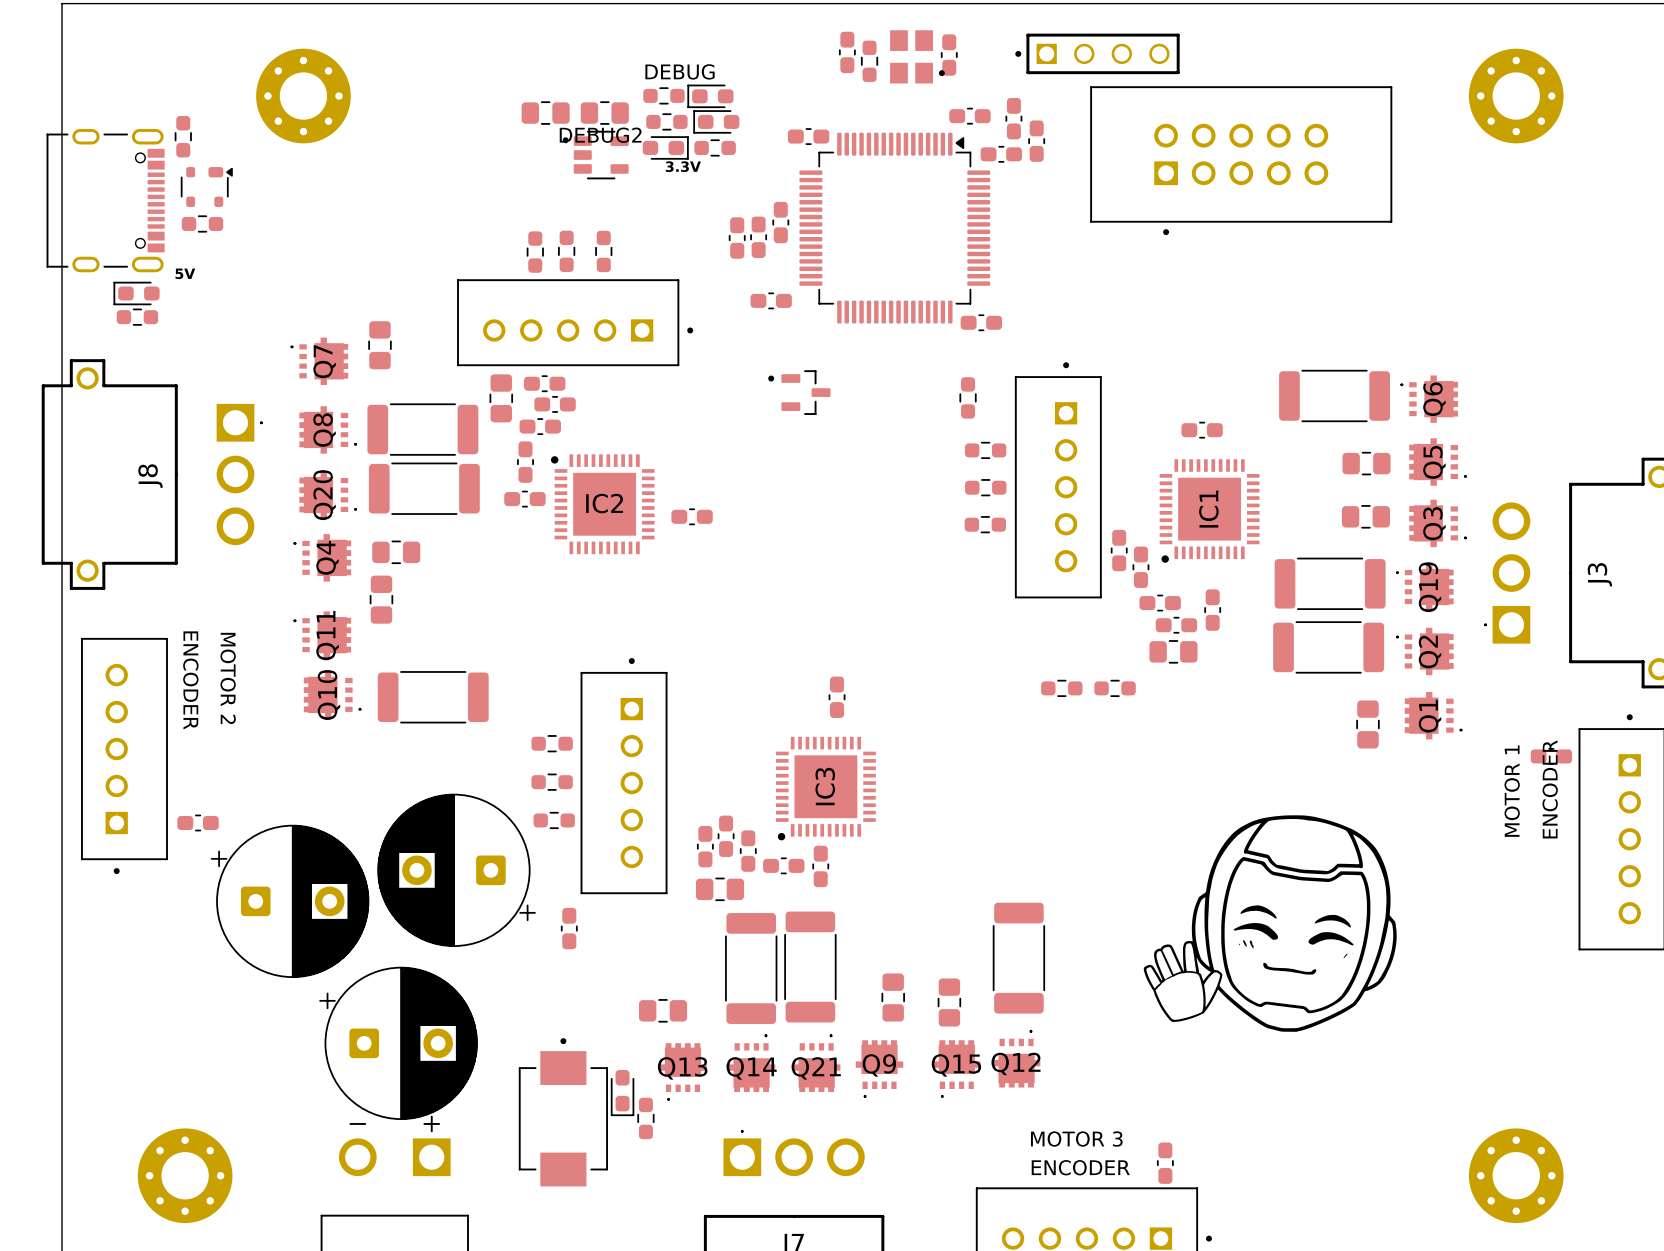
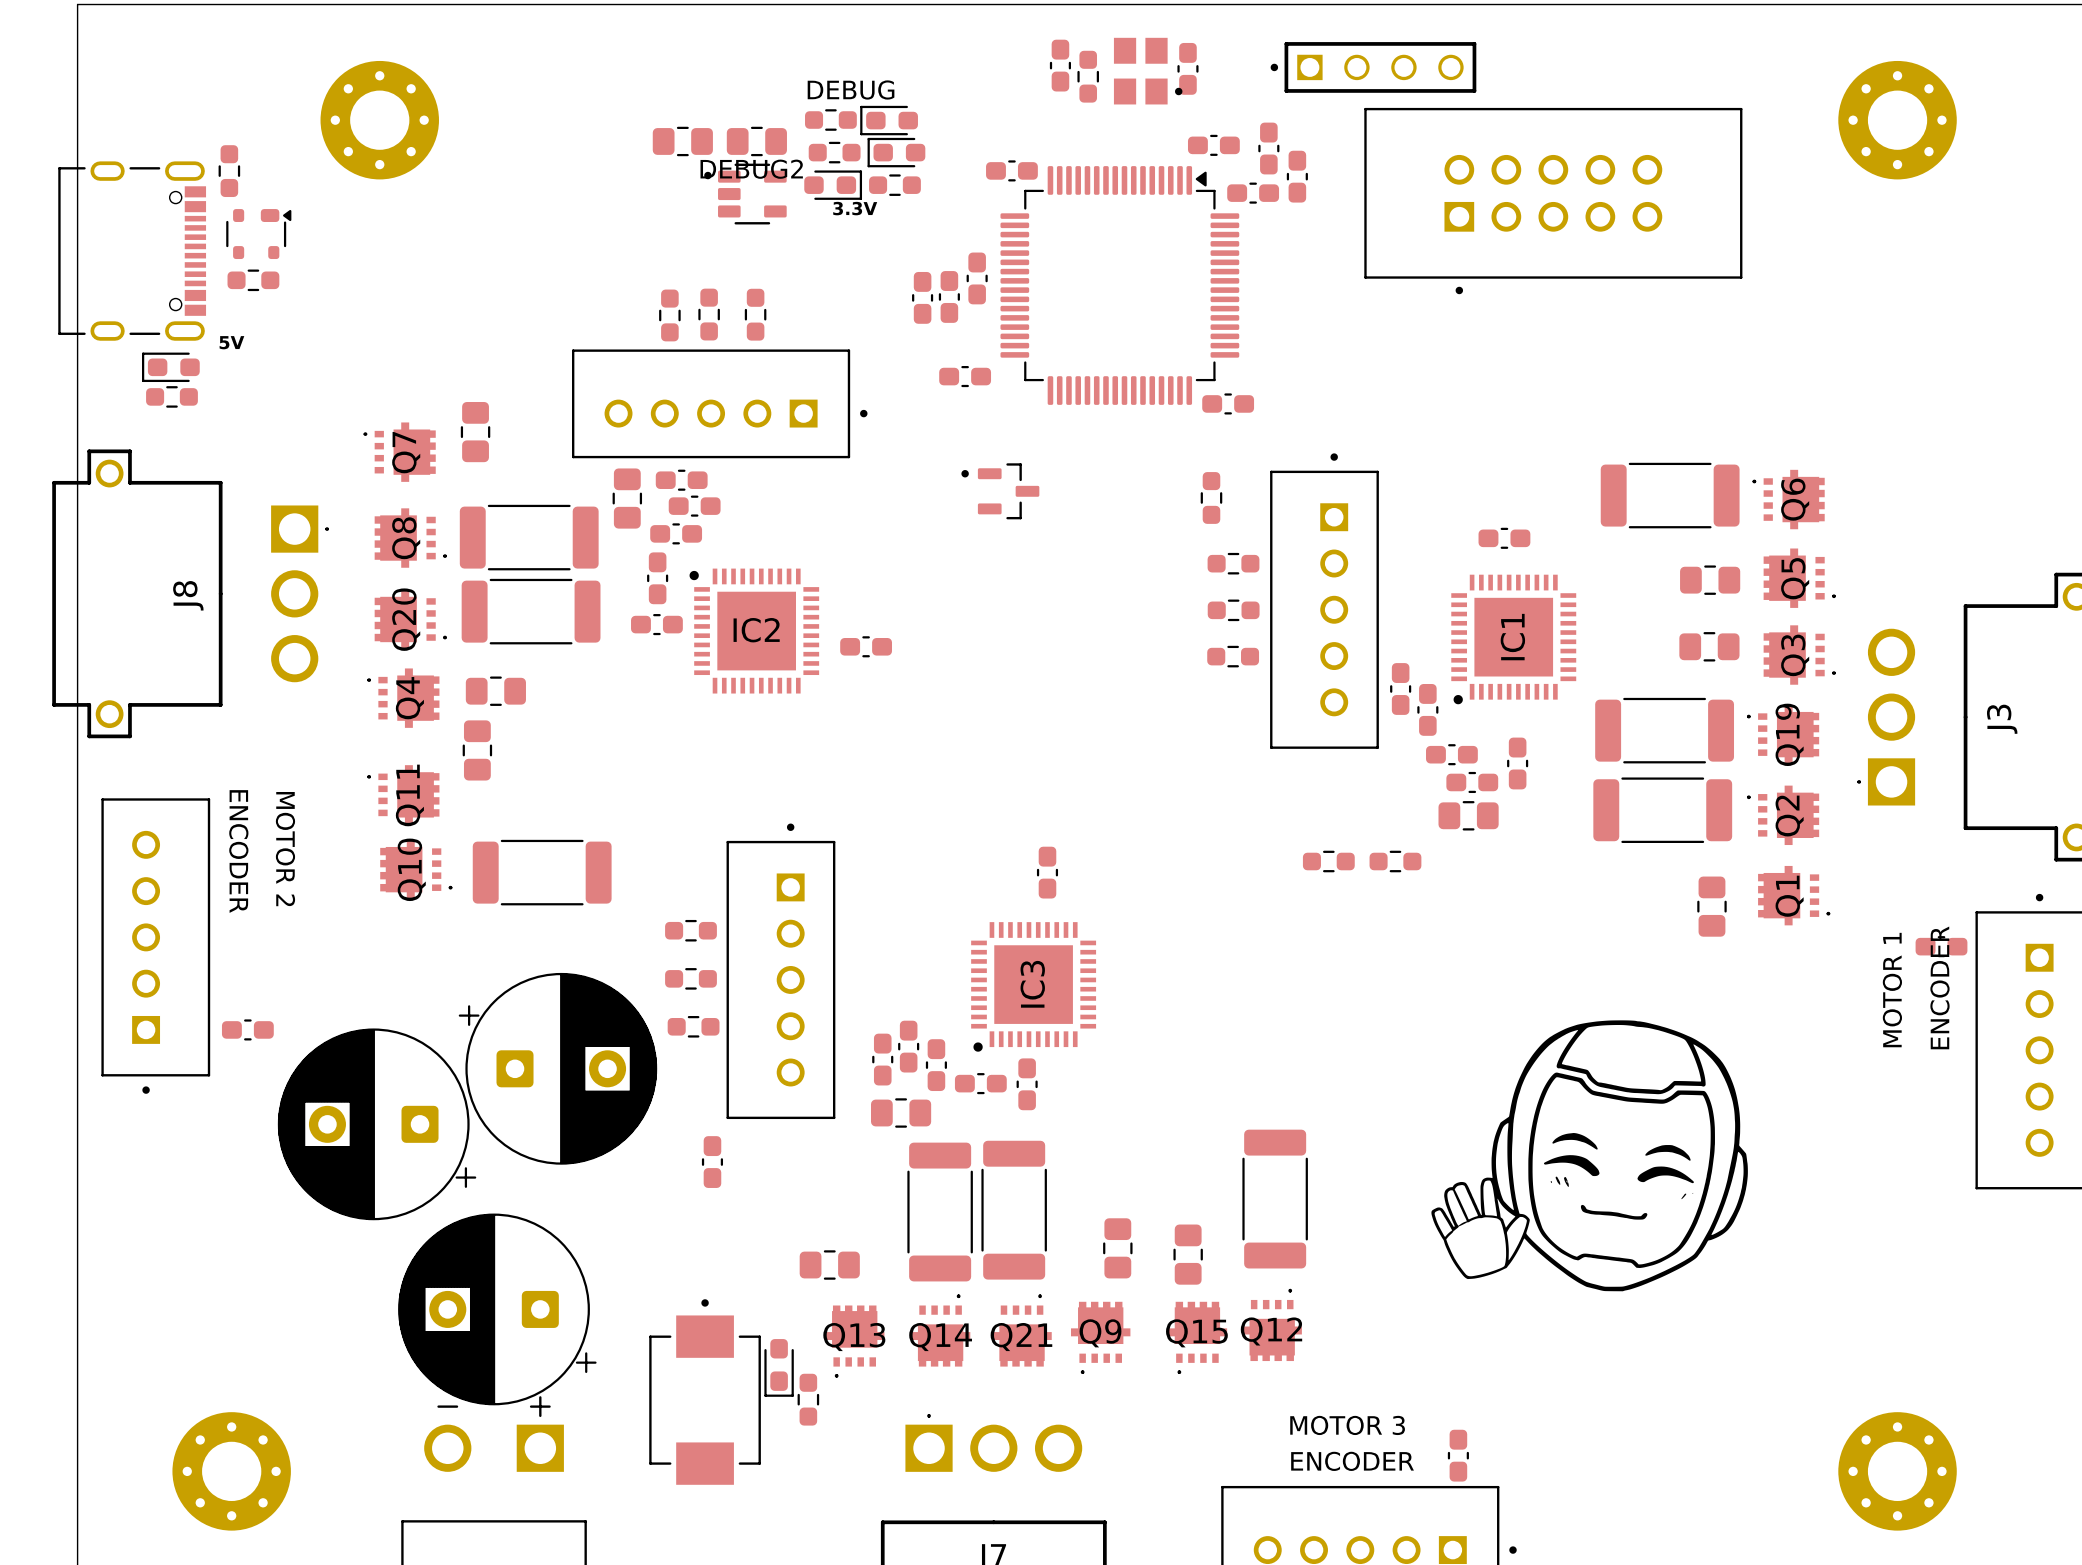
part rotation: 0° (456, 870) -> 180° (557, 1068)
part rotation: 0° (290, 901) -> 180° (377, 1124)
part rotation: 0° (398, 1043) -> 180° (497, 1309)

